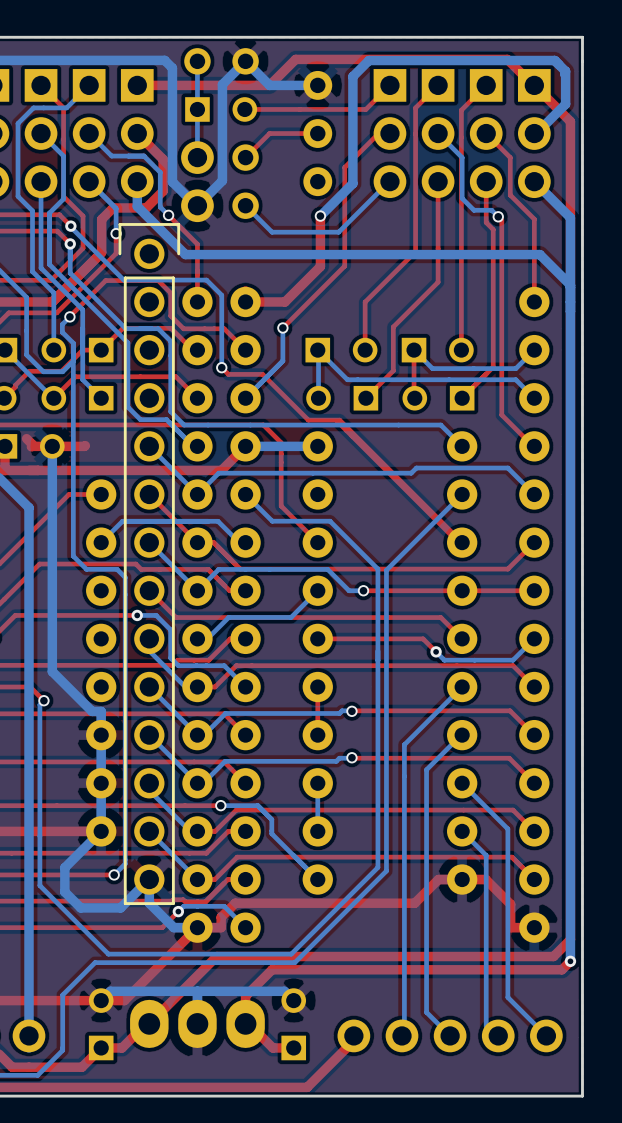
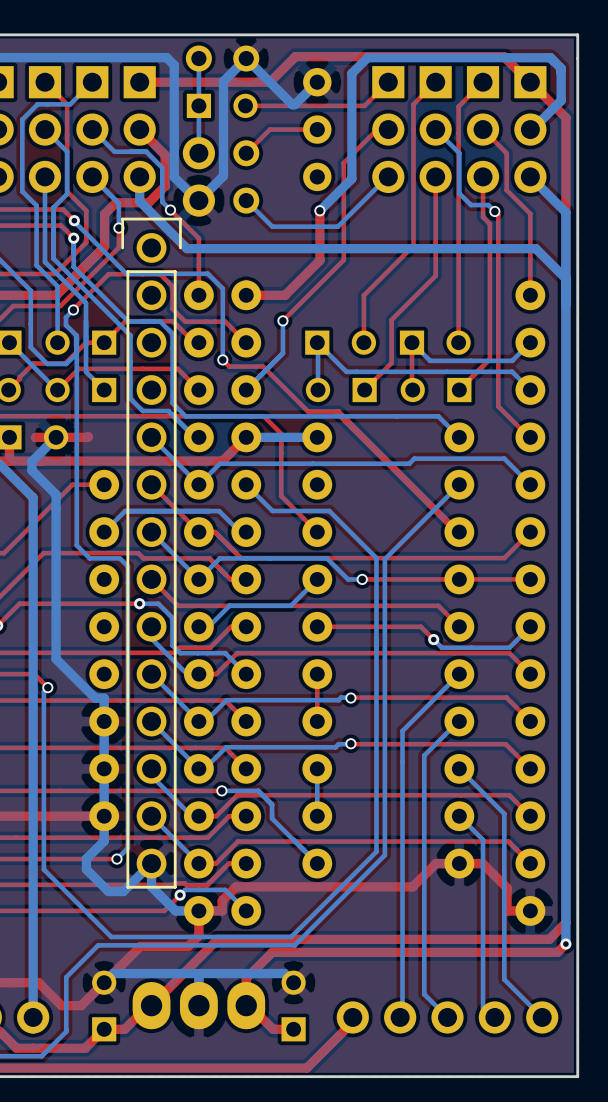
bottom track: (317, 85) (269, 85) -> (317, 82) (294, 104) (292, 104) (269, 82)
top track: (26, 438) (32, 446) -> none
bottom track: (52, 446) (52, 504) -> (56, 437) (31, 461) (31, 470) (56, 494)
bottom track: (101, 831) (64, 867) (64, 892) (80, 907) (105, 907) -> (104, 816) (104, 841) (86, 858) (86, 869) (108, 891)
top track: (197, 927) (124, 1000) (34, 1000) -> (198, 910) (198, 935) (188, 946) (140, 946) (81, 1005) (61, 1005) (38, 982)

